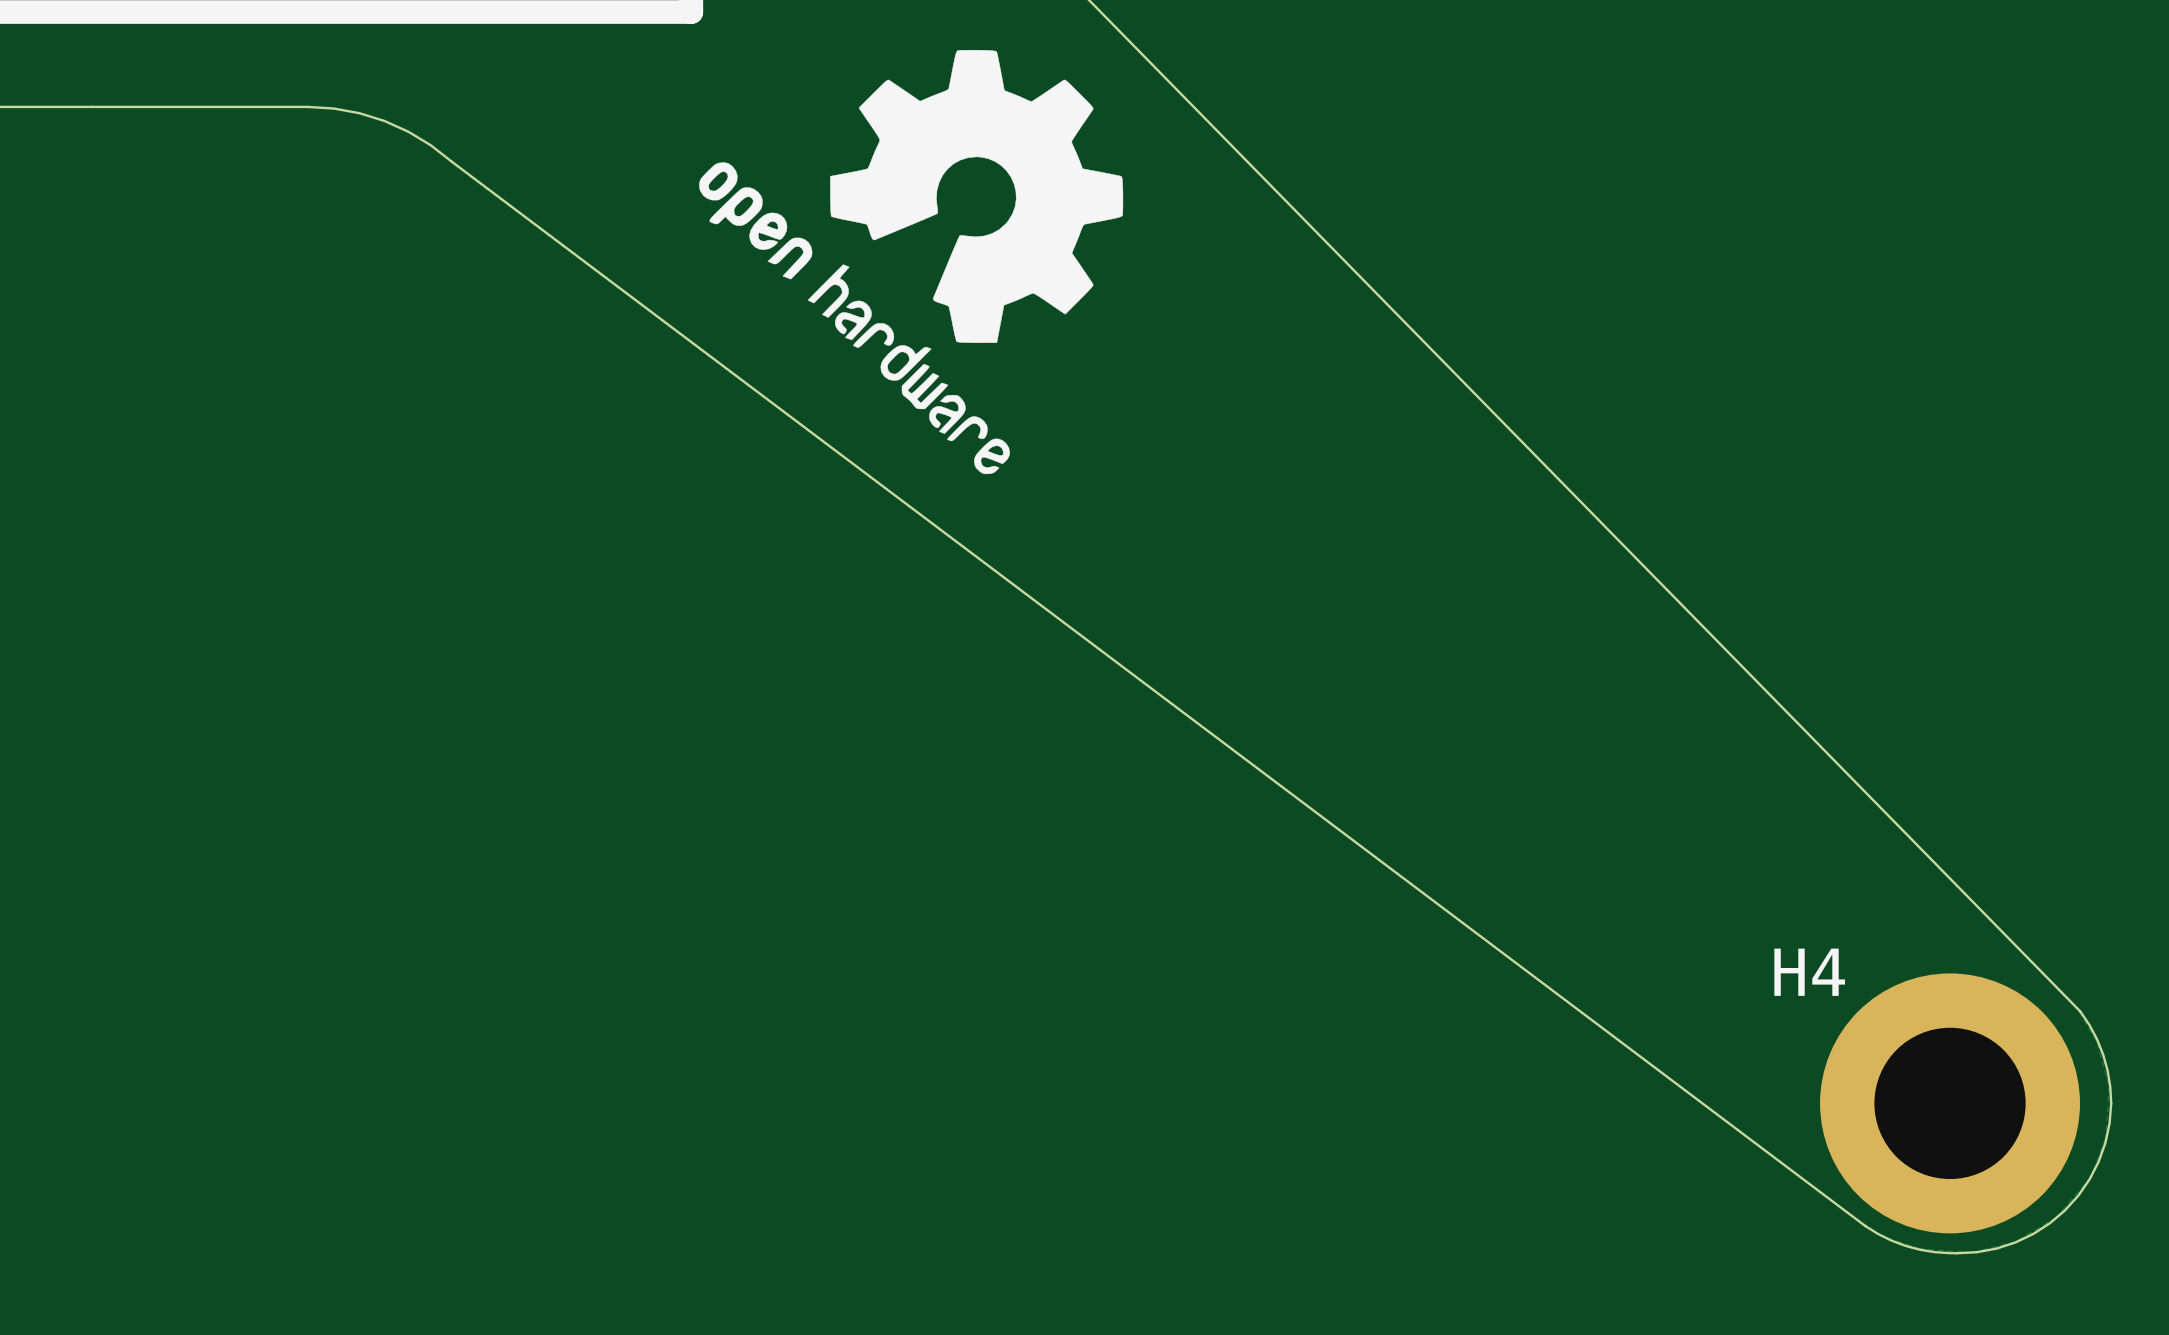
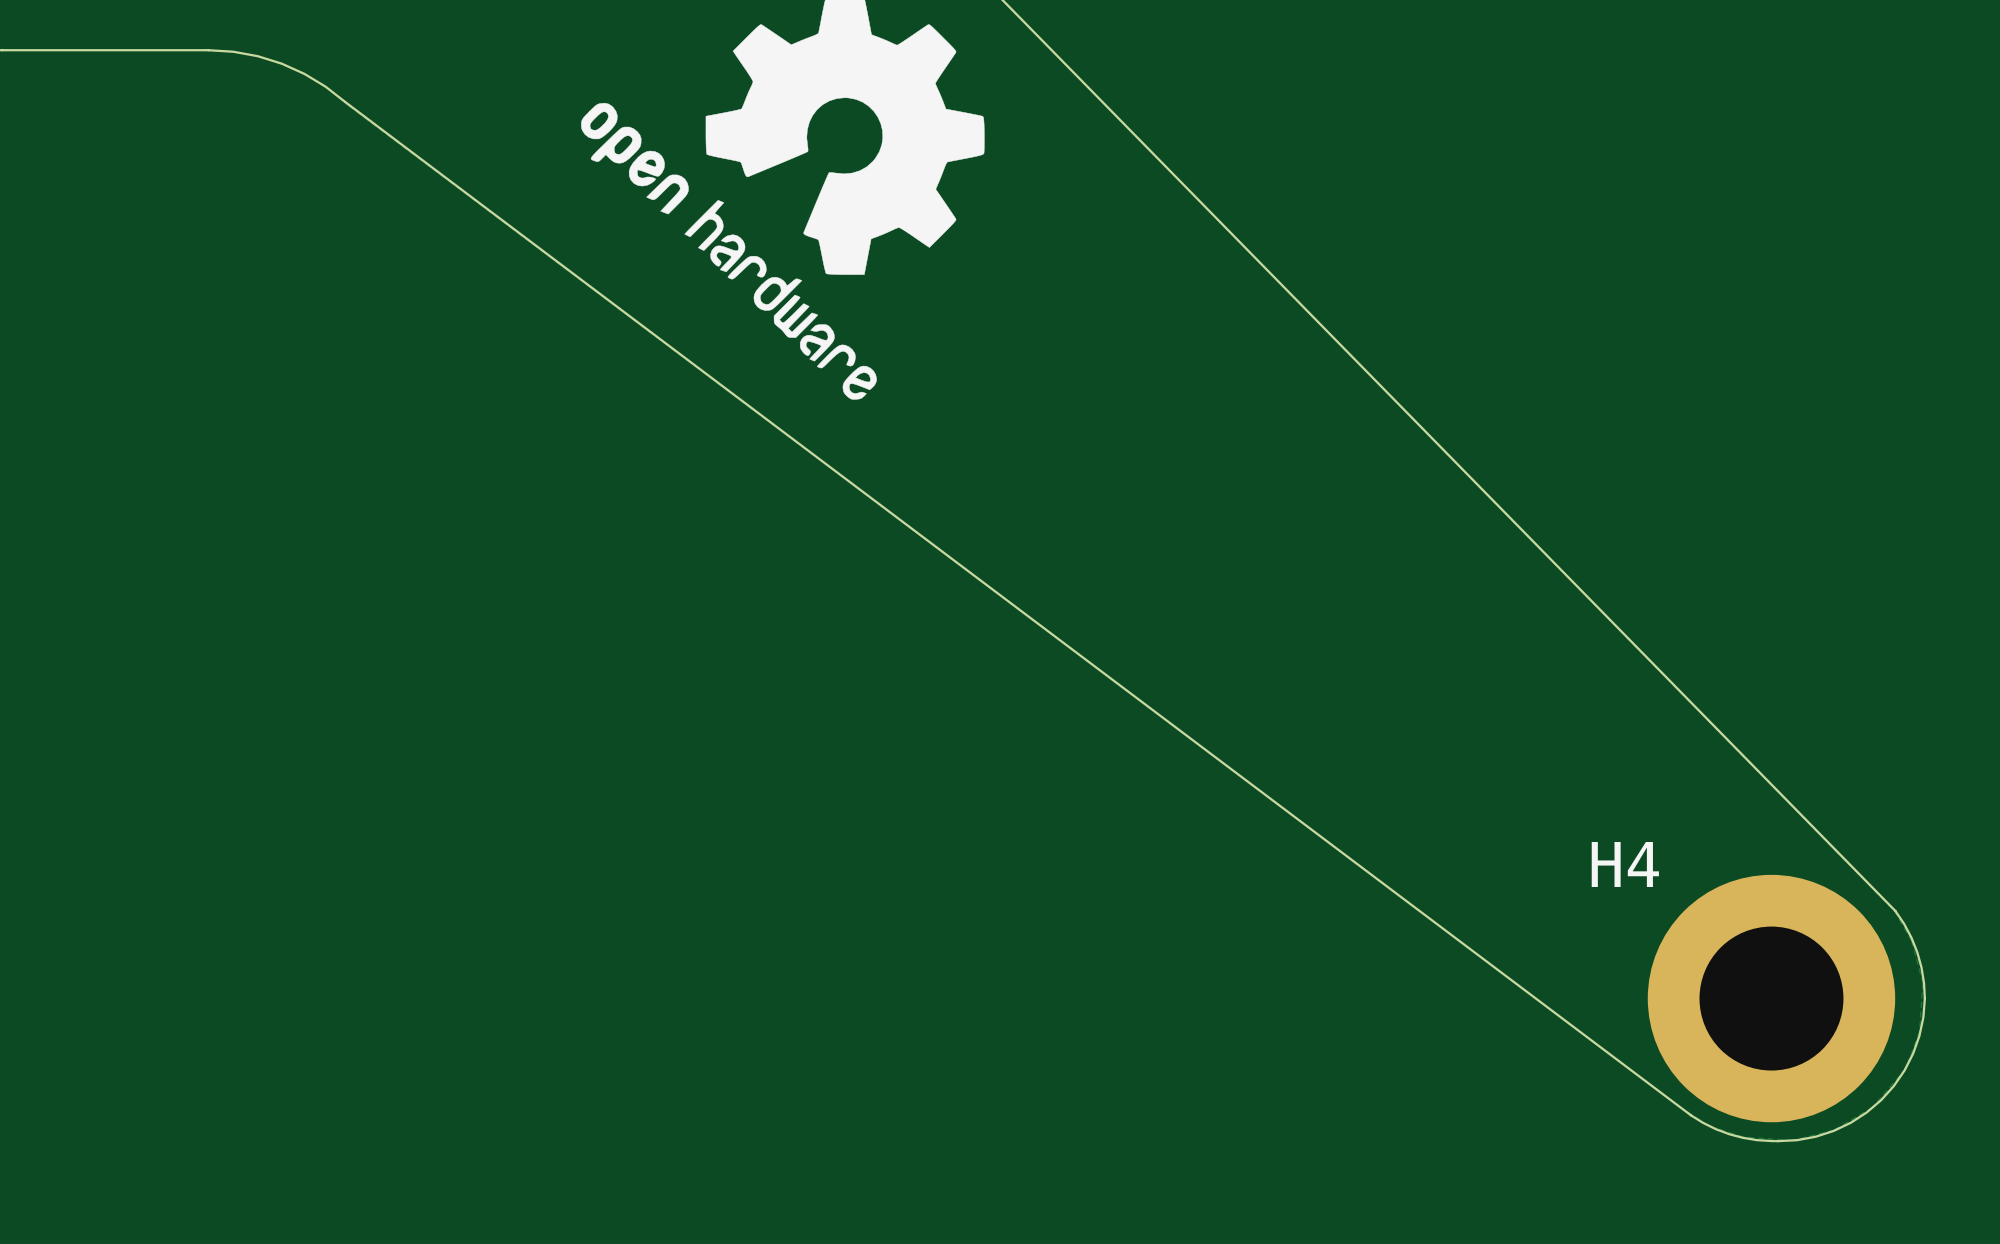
H4 name position: H4 (1809, 972) -> H4 (1625, 864)

